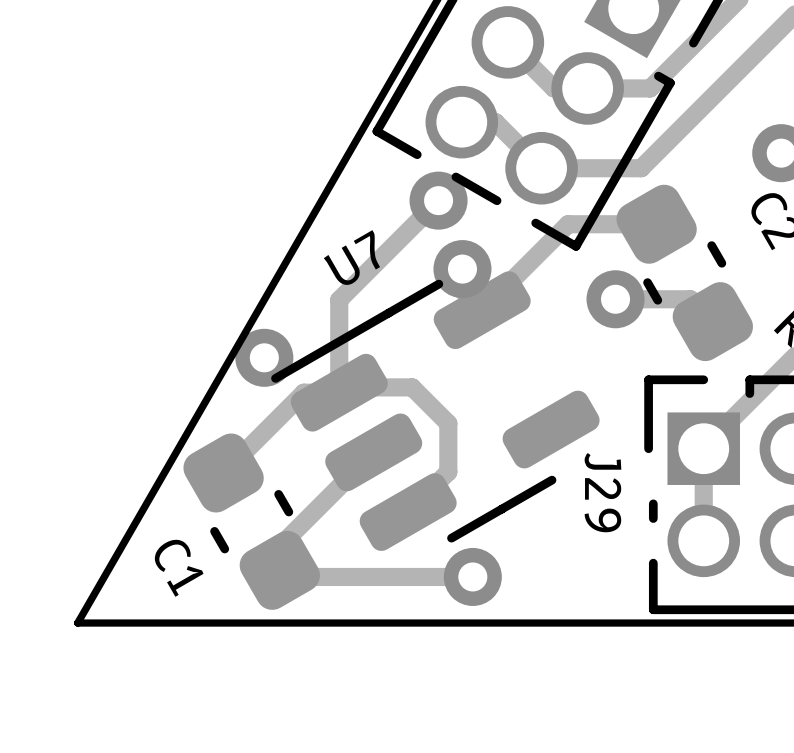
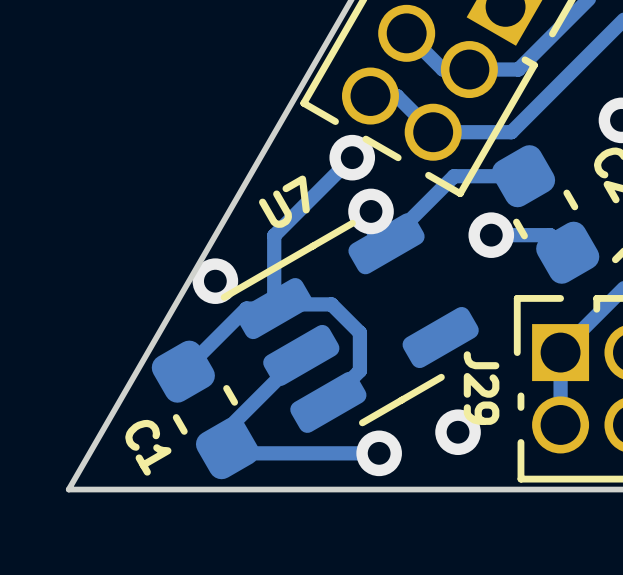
via: none -> (458, 432)

